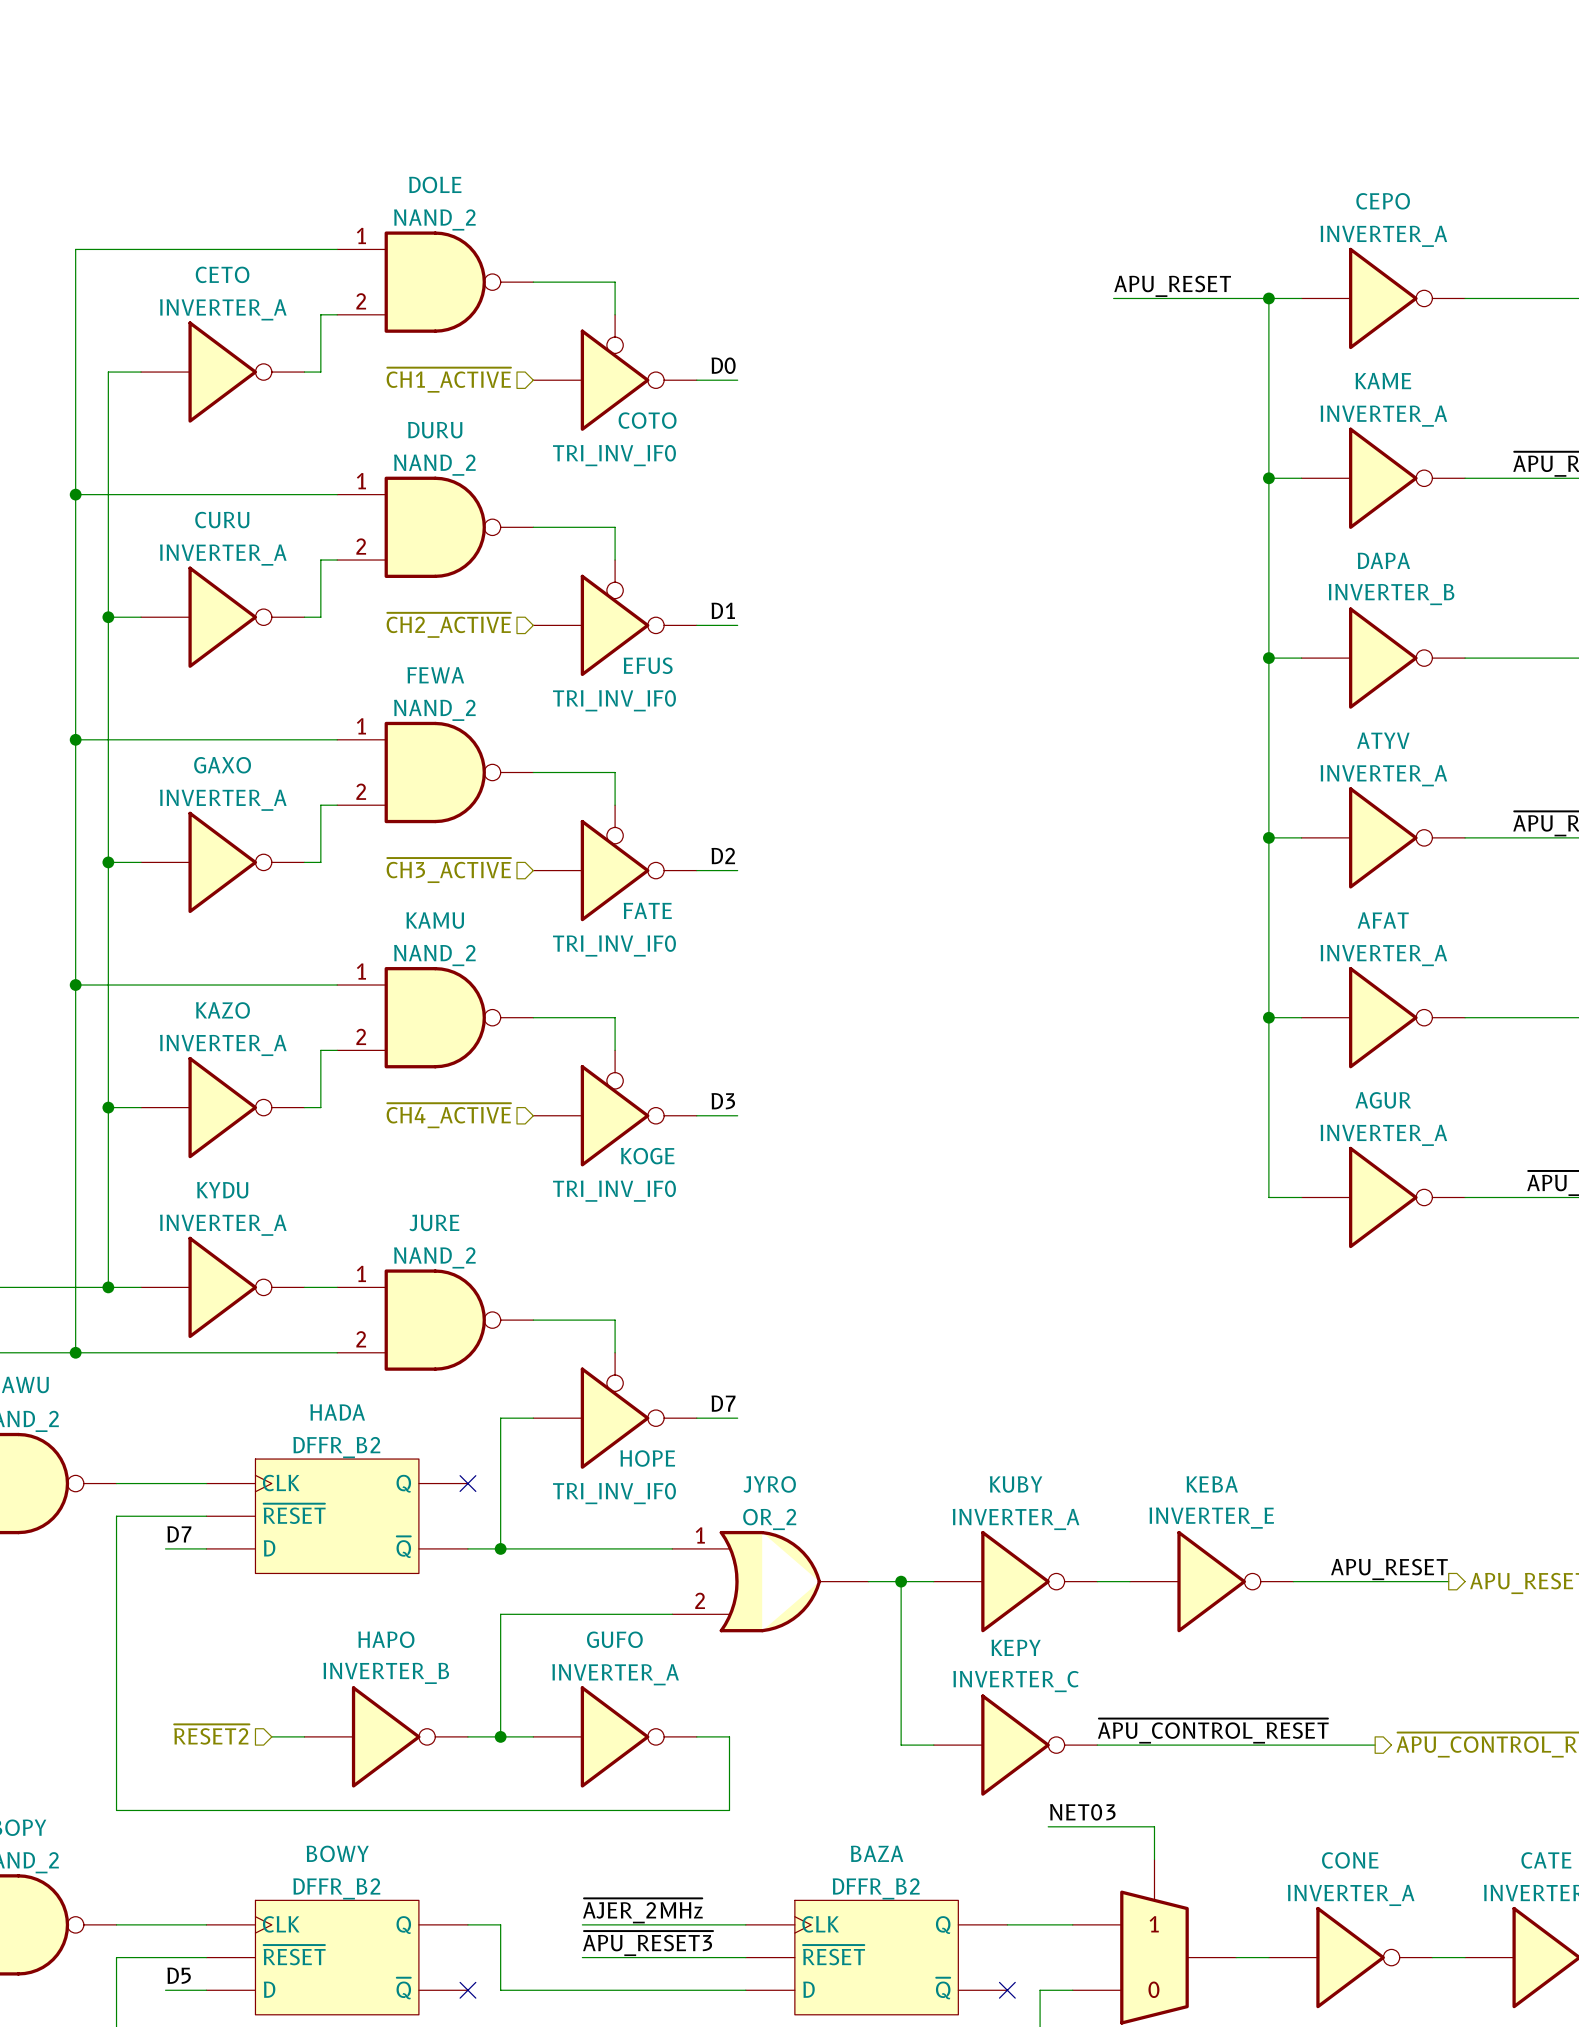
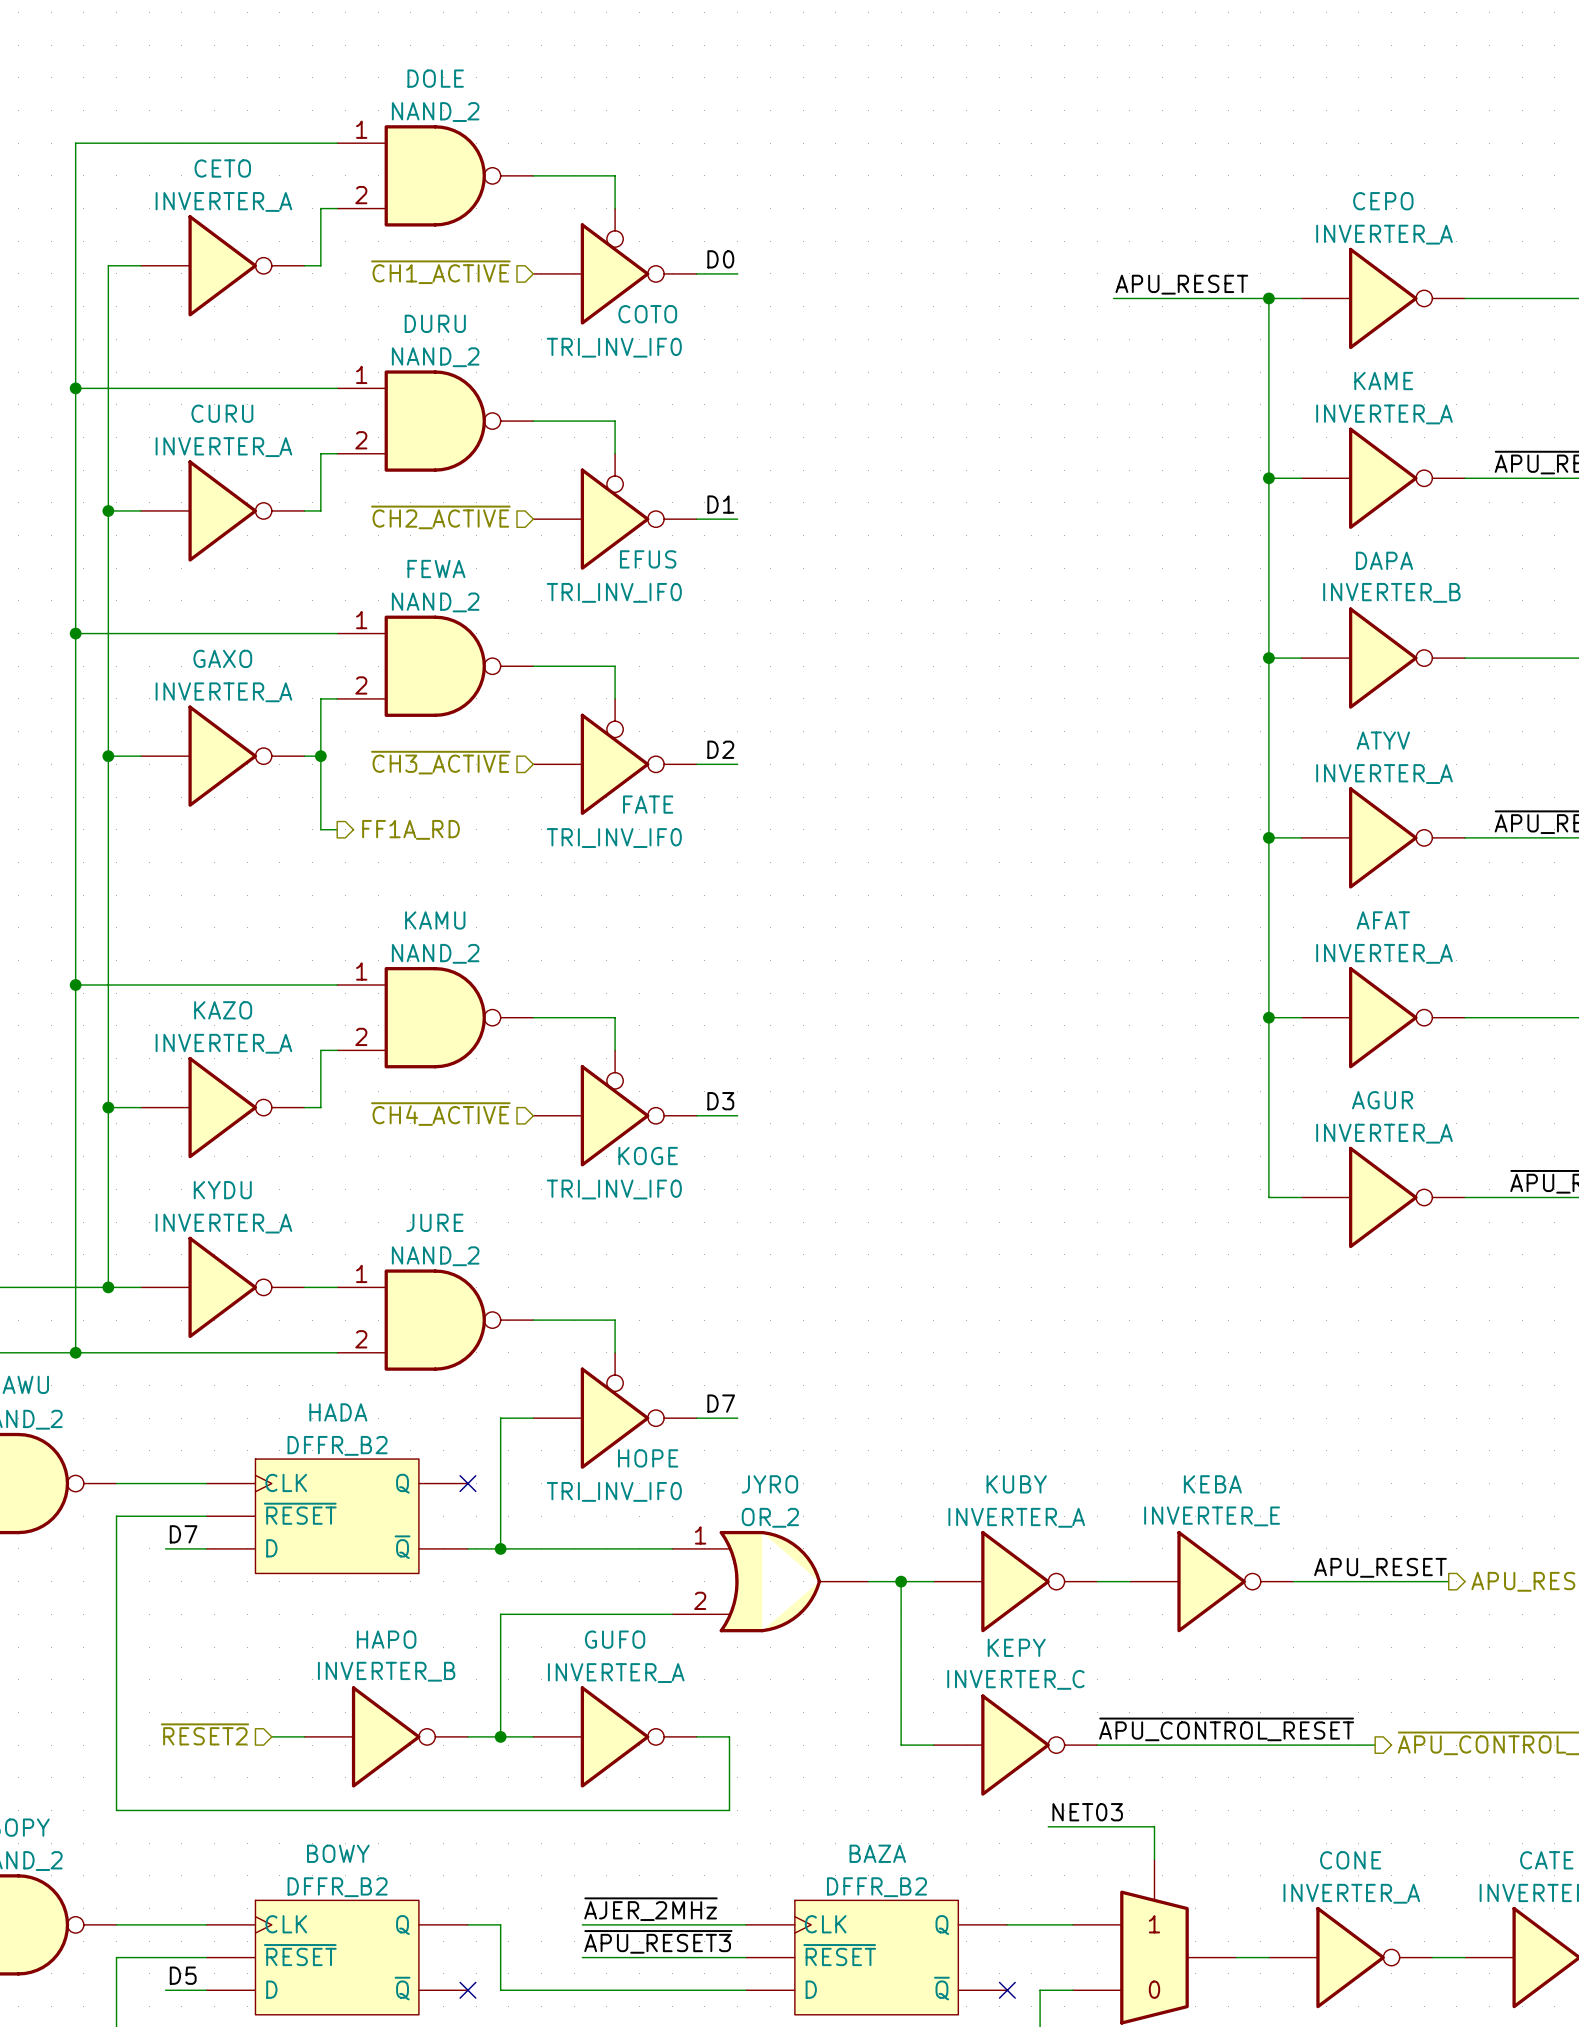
wire: (75, 249) (337, 249) -> (75, 249) (75, 143) (337, 143)
DOLE position: (435, 282) -> (435, 175)
wire: (533, 282) (615, 282) (615, 314) -> (533, 175) (615, 175) (615, 208)
wire: (337, 314) (320, 314) (320, 372) (304, 372) -> (337, 208) (320, 208) (320, 265) (304, 265)
label position: D0 (723, 365) -> D0 (720, 259)
wire: (108, 372) (141, 372) -> (108, 372) (108, 265) (141, 265)
CETO position: (222, 372) -> (222, 265)
COTO position: (615, 372) -> (615, 266)
hierarchical label position: ~{CH1_ACTIVE} (448, 380) -> ~{CH1_ACTIVE} (440, 272)
wire: (696, 380) (737, 380) -> (696, 273) (737, 273)
junction: none -> (75, 388)
wire: (75, 494) (337, 494) -> (75, 388) (337, 388)
junction position: (75, 494) -> (108, 510)
DURU position: (435, 527) -> (435, 421)
wire: (533, 527) (615, 527) (615, 560) -> (533, 421) (615, 421) (615, 453)
wire: (337, 560) (320, 560) (320, 617) (304, 617) -> (337, 453) (320, 453) (320, 510) (304, 510)
label position: D1 (723, 610) -> D1 (720, 504)
wire: (108, 617) (141, 617) -> (108, 510) (141, 510)
junction position: (108, 617) -> (75, 633)
CURU position: (222, 617) -> (222, 510)
EFUS position: (615, 618) -> (615, 511)
hierarchical label position: ~{CH2_ACTIVE} (448, 625) -> ~{CH2_ACTIVE} (440, 517)
wire: (696, 625) (737, 625) -> (696, 519) (737, 519)
wire: (75, 739) (337, 739) -> (75, 633) (337, 633)
junction position: (75, 739) -> (108, 756)
wire: none -> (304, 756) (320, 756)
junction: none -> (320, 756)
FEWA position: (435, 772) -> (435, 666)
wire: (533, 772) (615, 772) (615, 805) -> (533, 666) (615, 666) (615, 698)
wire: (320, 805) (337, 805) -> (320, 805) (320, 698) (337, 698)
wire: (320, 829) (320, 862) (304, 862) -> (320, 829) (337, 829)
hierarchical label: none -> FF1A_RD (411, 829)
label position: D2 (723, 856) -> D2 (720, 749)
wire: (108, 862) (141, 862) -> (108, 756) (141, 756)
junction: (108, 862) -> none
GAXO position: (222, 862) -> (222, 756)
FATE position: (615, 863) -> (615, 756)
hierarchical label position: ~{CH3_ACTIVE} (448, 870) -> ~{CH3_ACTIVE} (440, 762)
wire: (696, 870) (737, 870) -> (696, 764) (737, 764)

